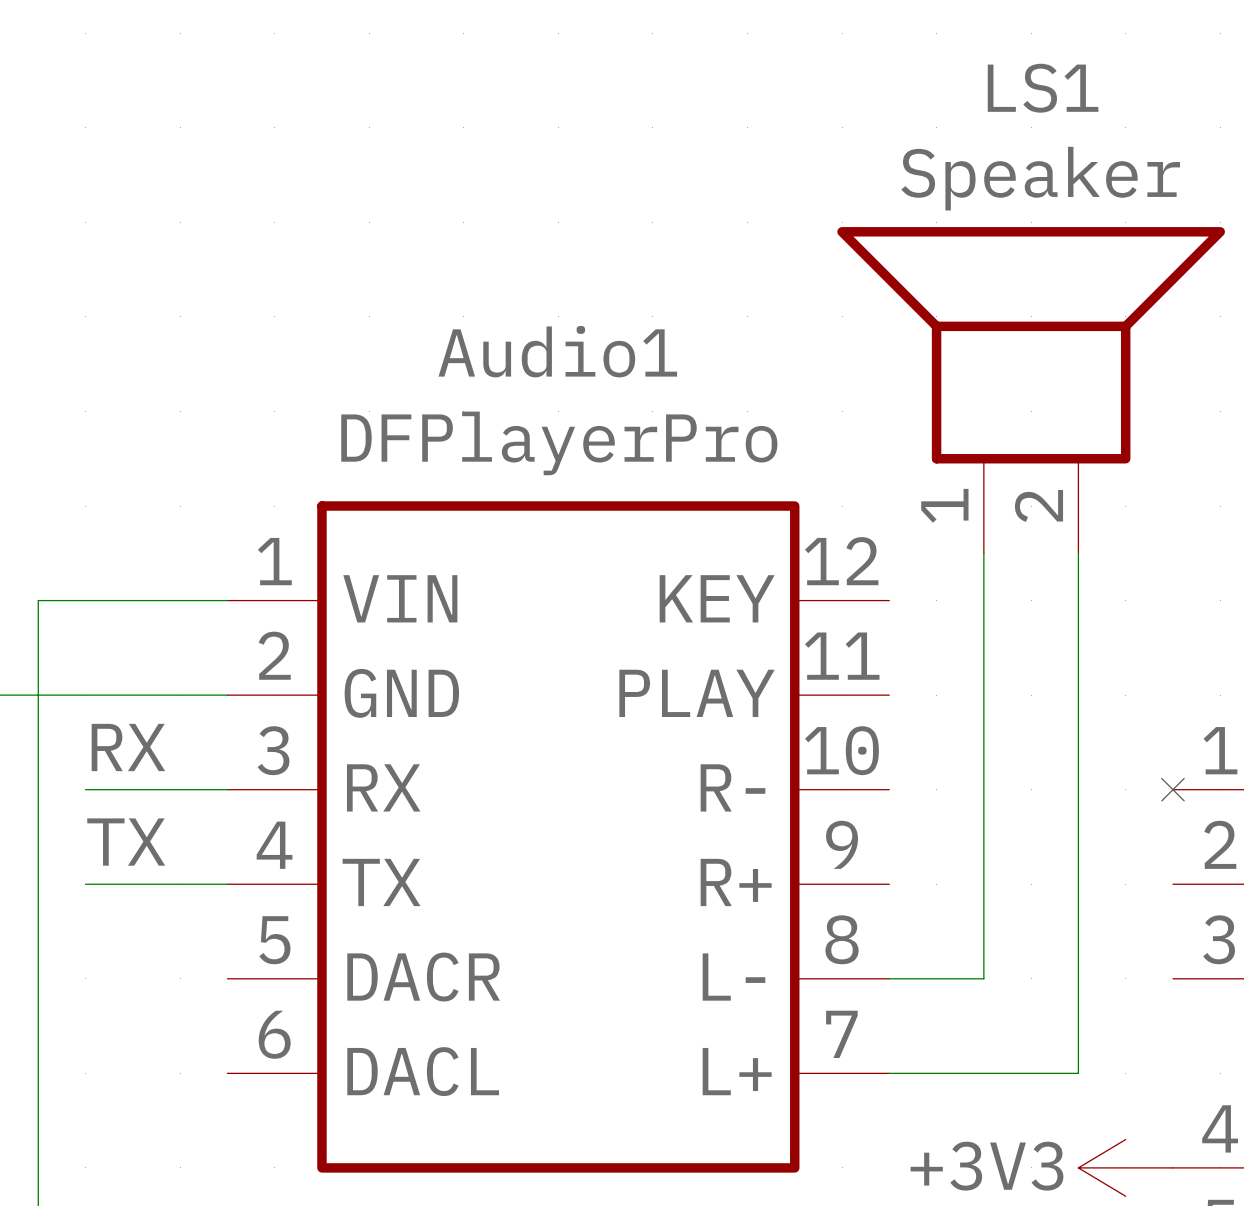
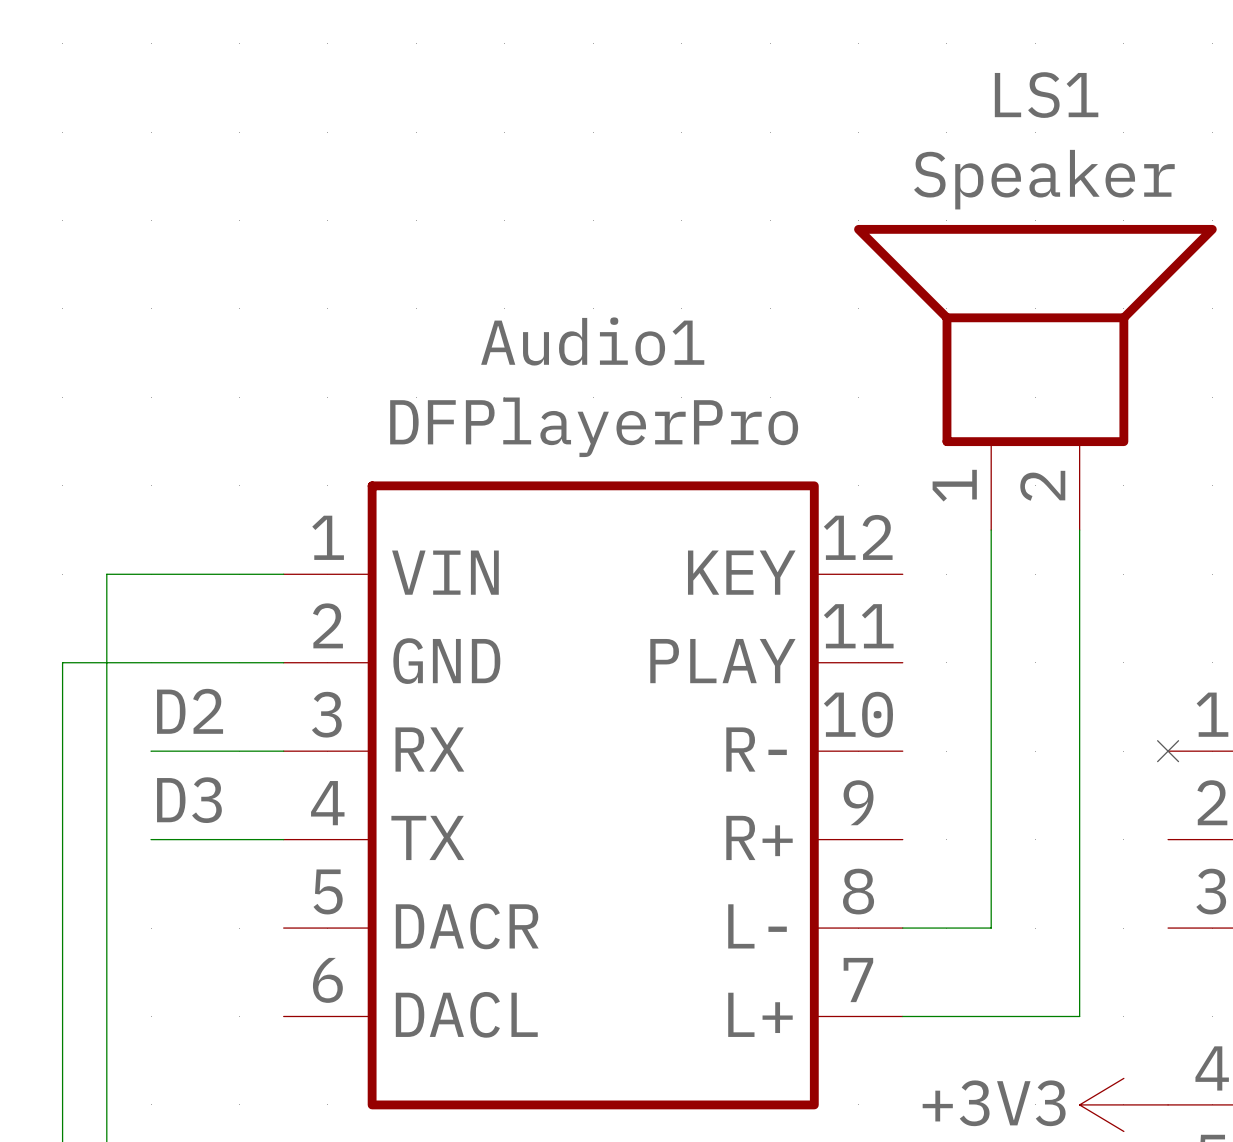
label: RX (128, 747) -> D2 (190, 711)
label: TX (126, 842) -> D3 (189, 800)

